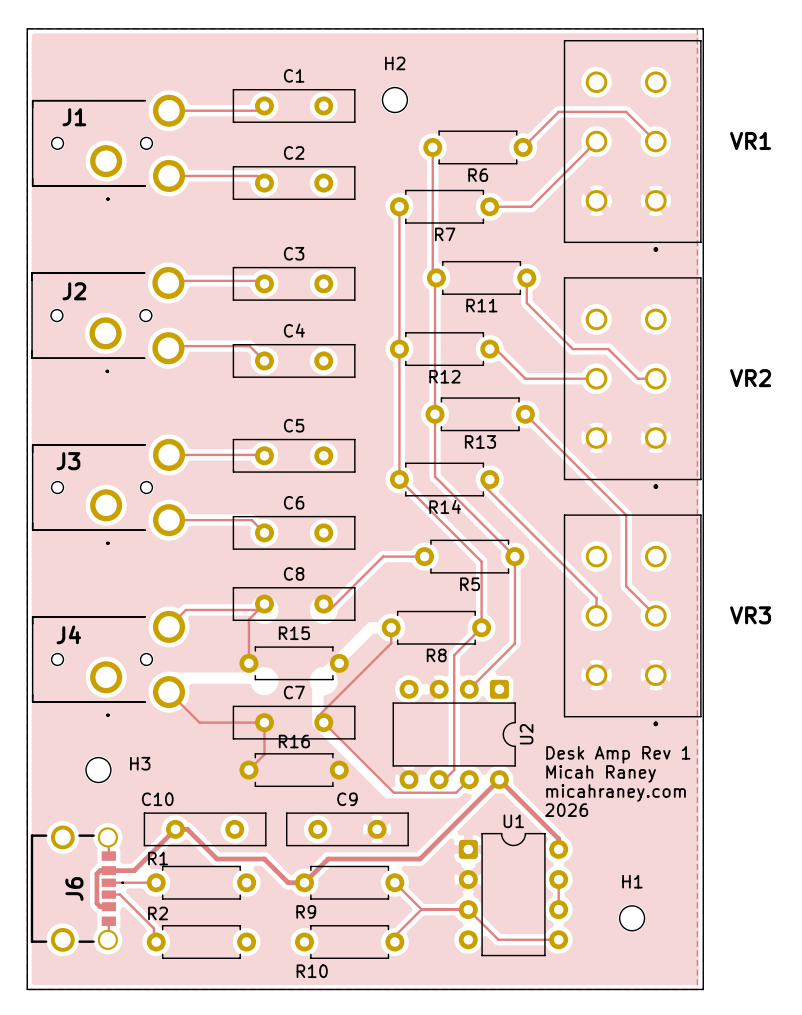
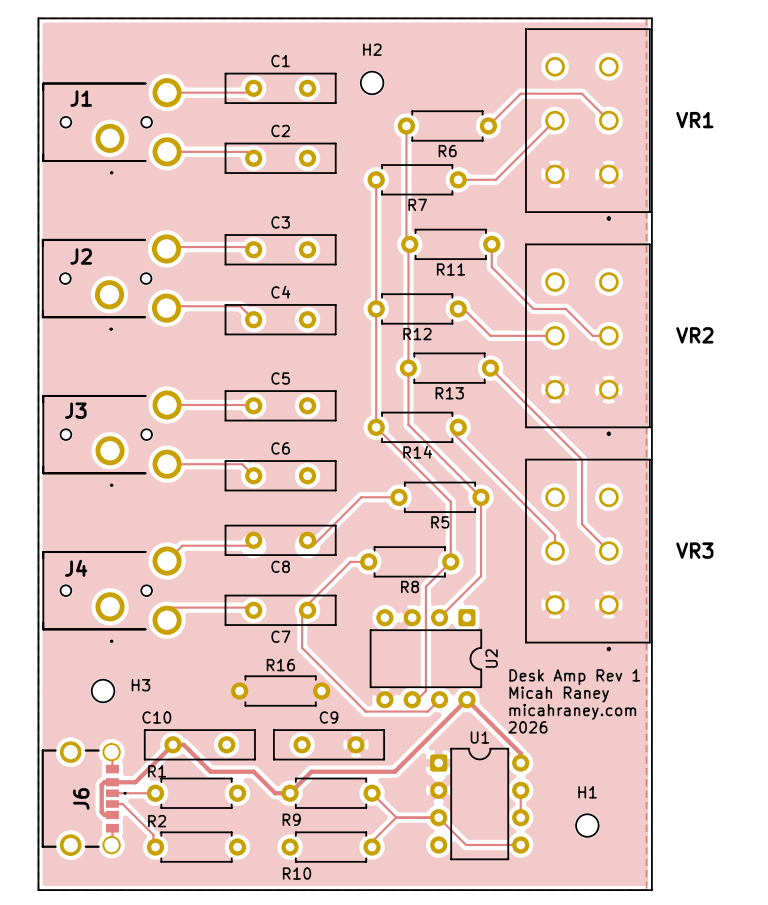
C8 name position: C8 (294, 573) -> C8 (280, 566)
track: (264, 604) (248, 619) (248, 663) -> none
track: (391, 627) (391, 643) (317, 716) (393, 792) -> (368, 561) (350, 561) (302, 610) (302, 647) (365, 711) (371, 711)
R15: (294, 663) -> none
track: none -> (167, 607) (245, 607) (248, 610)
track: (169, 692) (199, 722) (264, 722) (264, 754) (248, 770) -> none
C7 name position: C7 (294, 692) -> C7 (280, 636)
C7 position: (294, 722) -> (280, 610)

